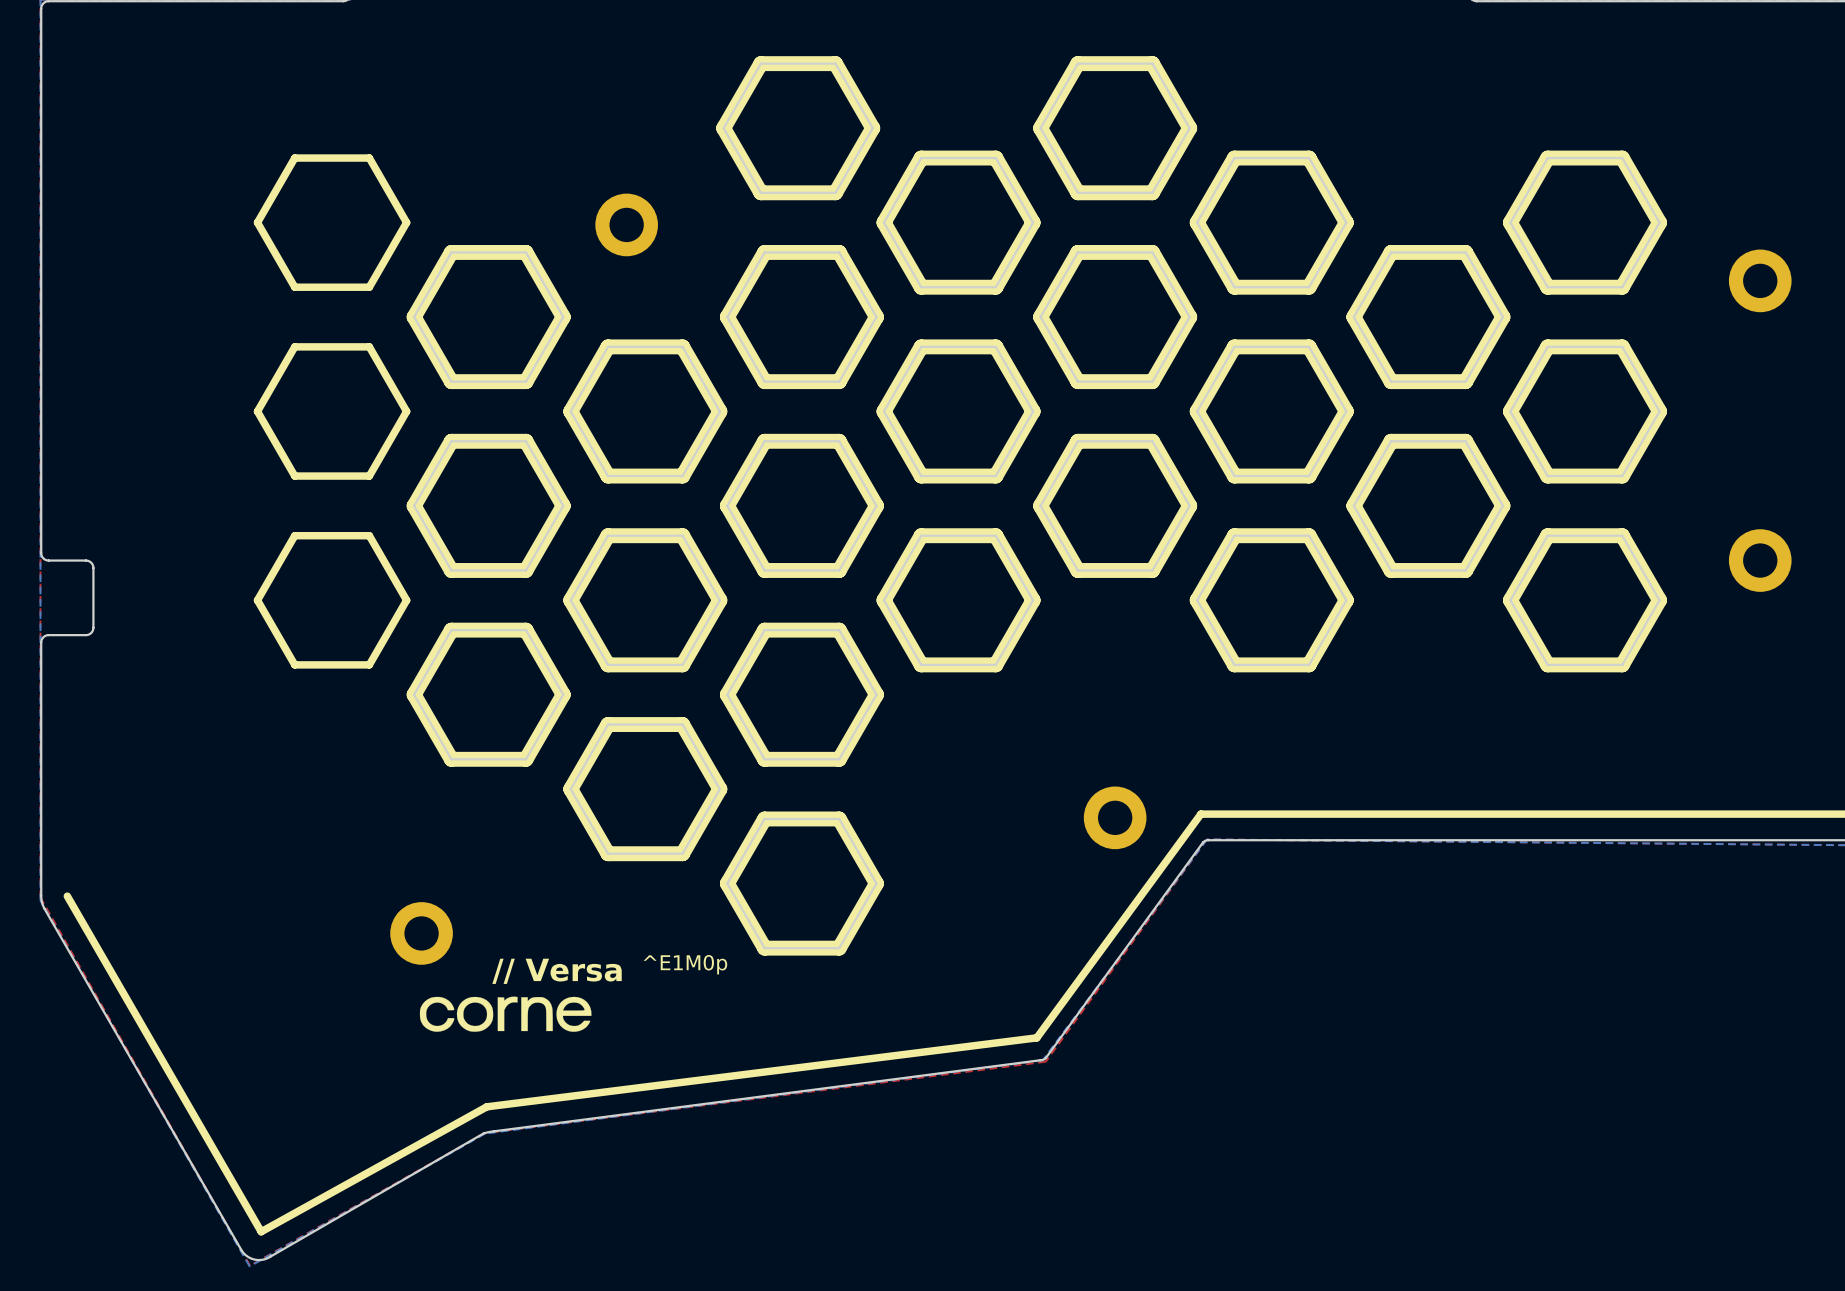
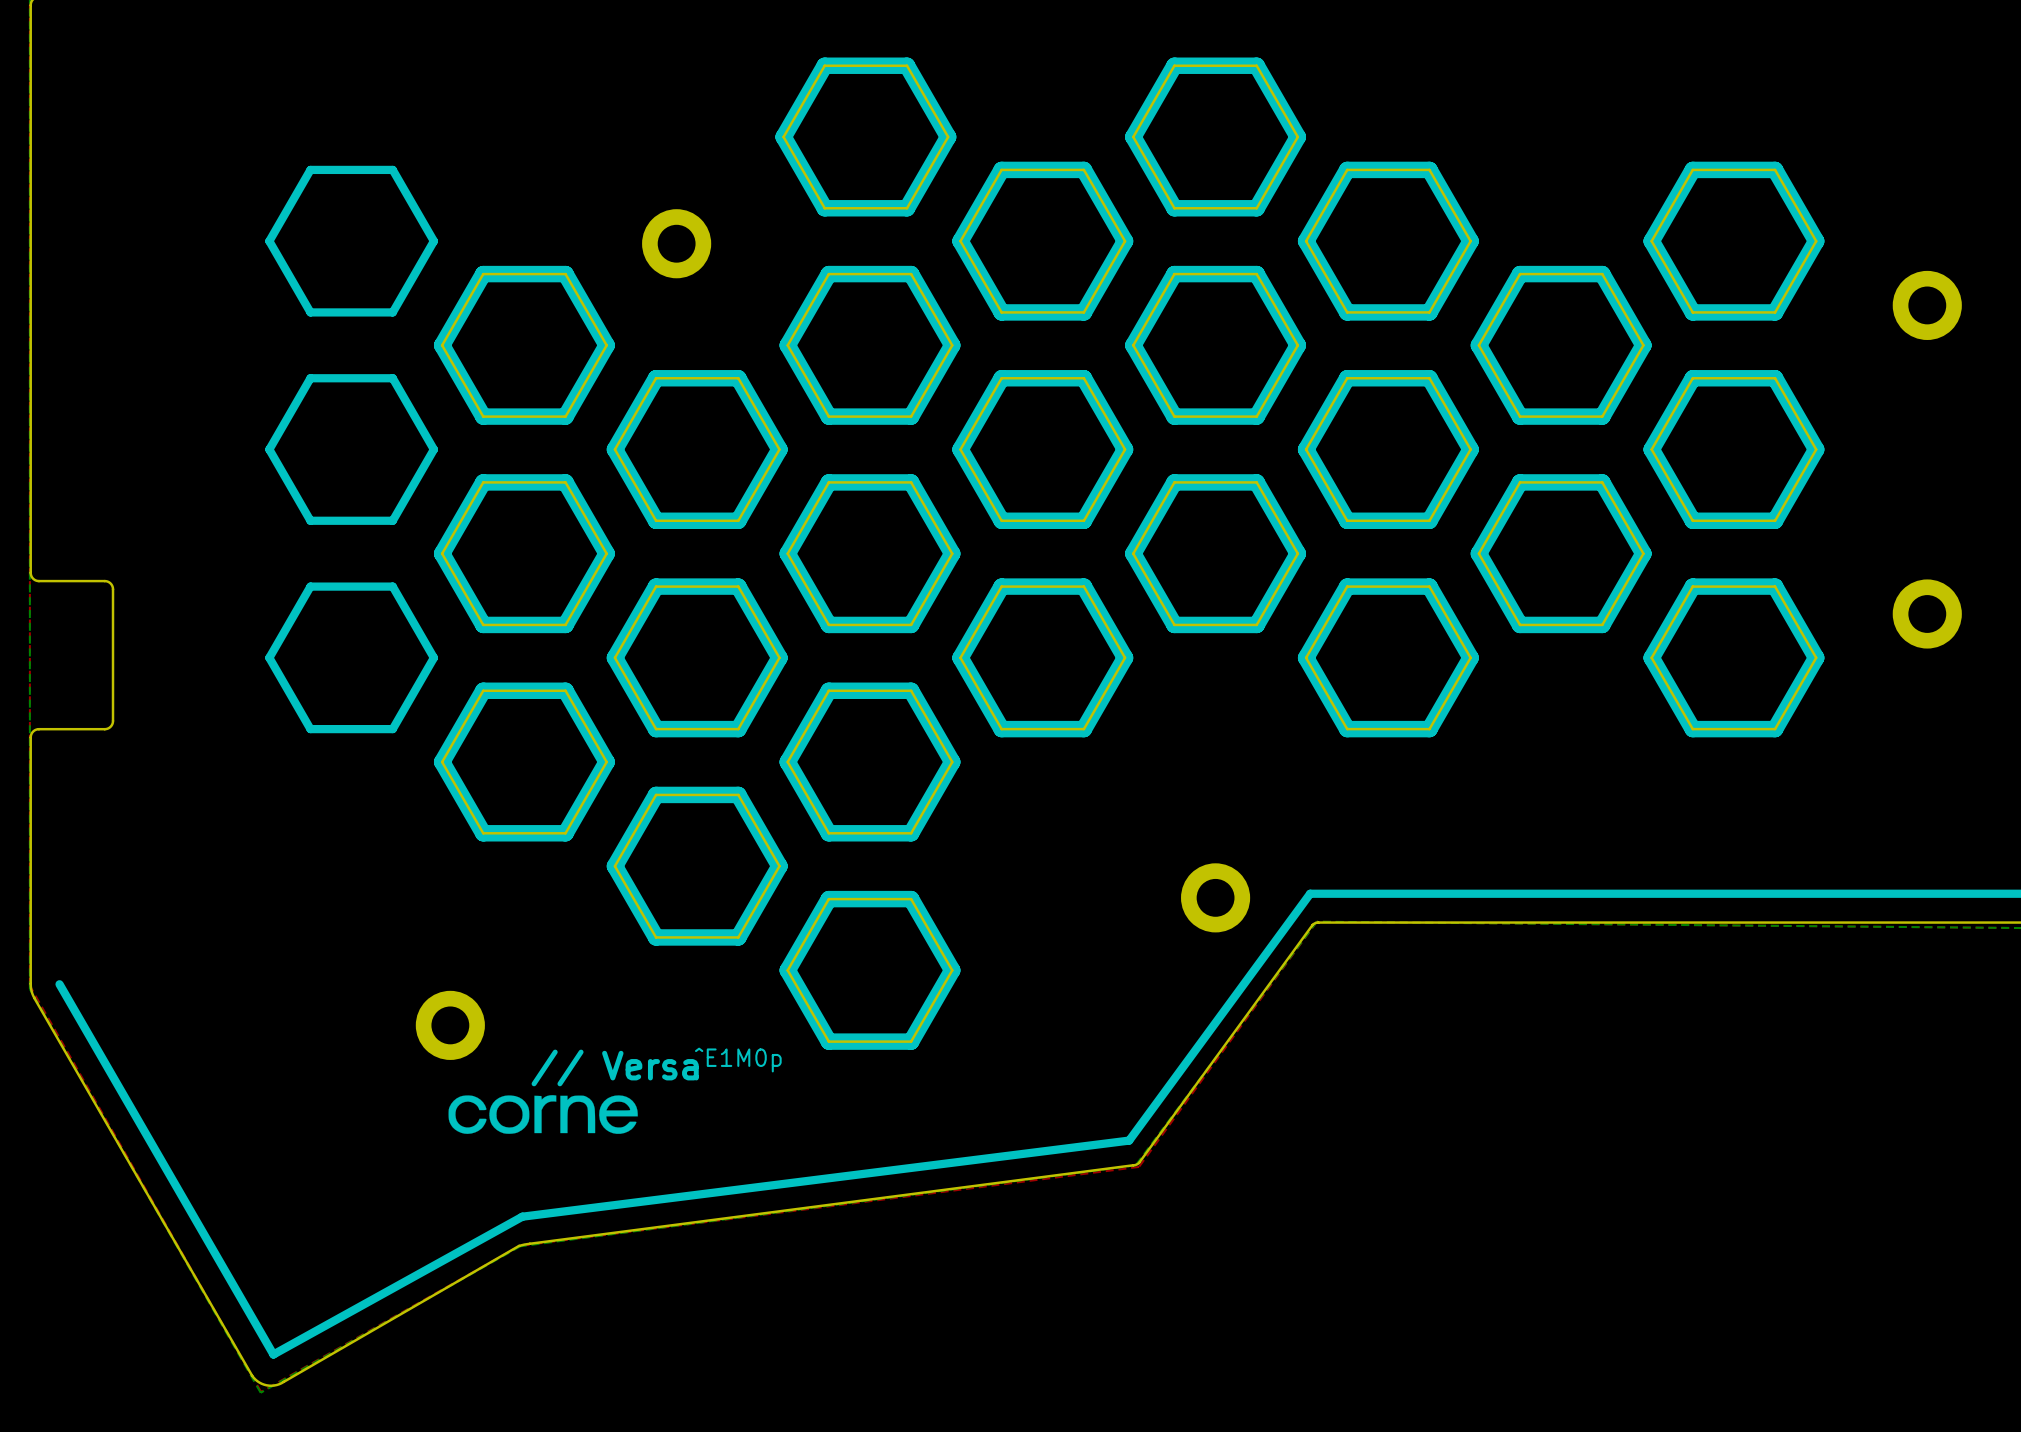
board edge: (41, 523) (41, 554) (44, 559) (86, 560) (91, 563) (93, 568) (92, 631) (86, 635) (44, 636) (41, 641) (41, 672) -> (30, 572) (32, 577) (36, 580) (105, 581) (111, 584) (113, 589) (111, 725) (104, 729) (37, 729) (32, 732) (30, 737)

